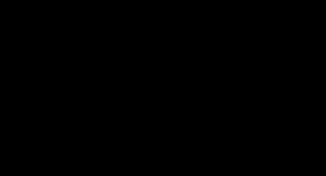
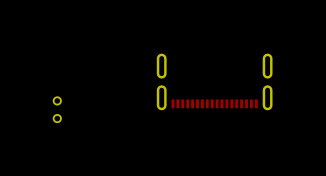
part: none -> (214, 81)
part: none -> (57, 109)

